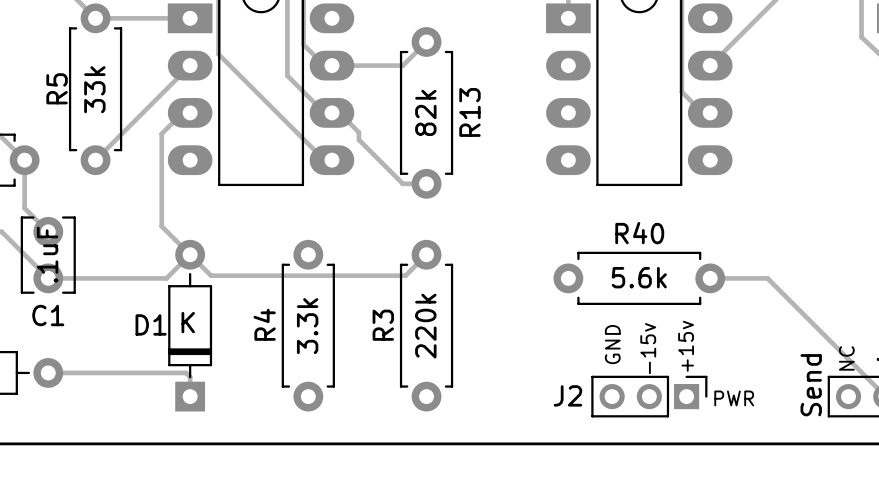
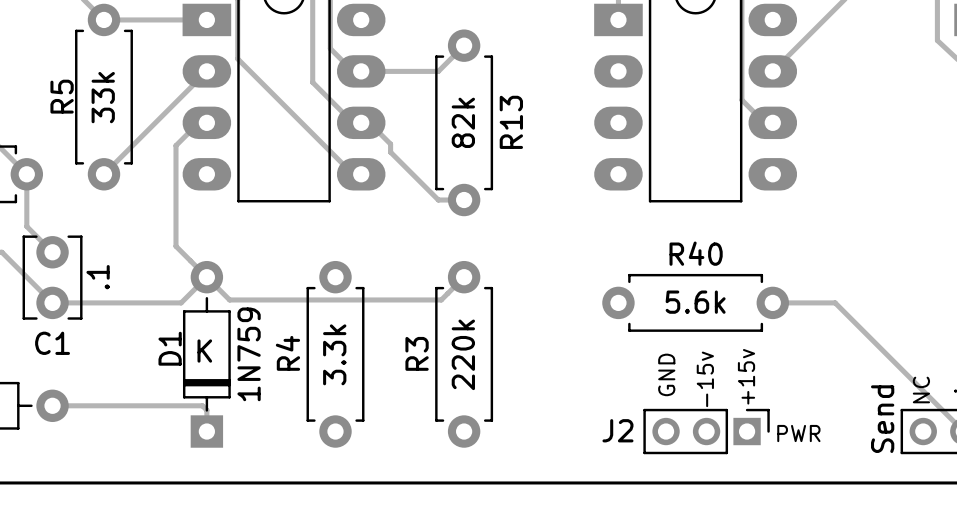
C1 value: .1uF (47, 254) -> .1 (98, 277)
D1 name rotation: 0° (151, 324) -> 90° counterclockwise (170, 348)
D1 value: none -> 1N759 (249, 354)

